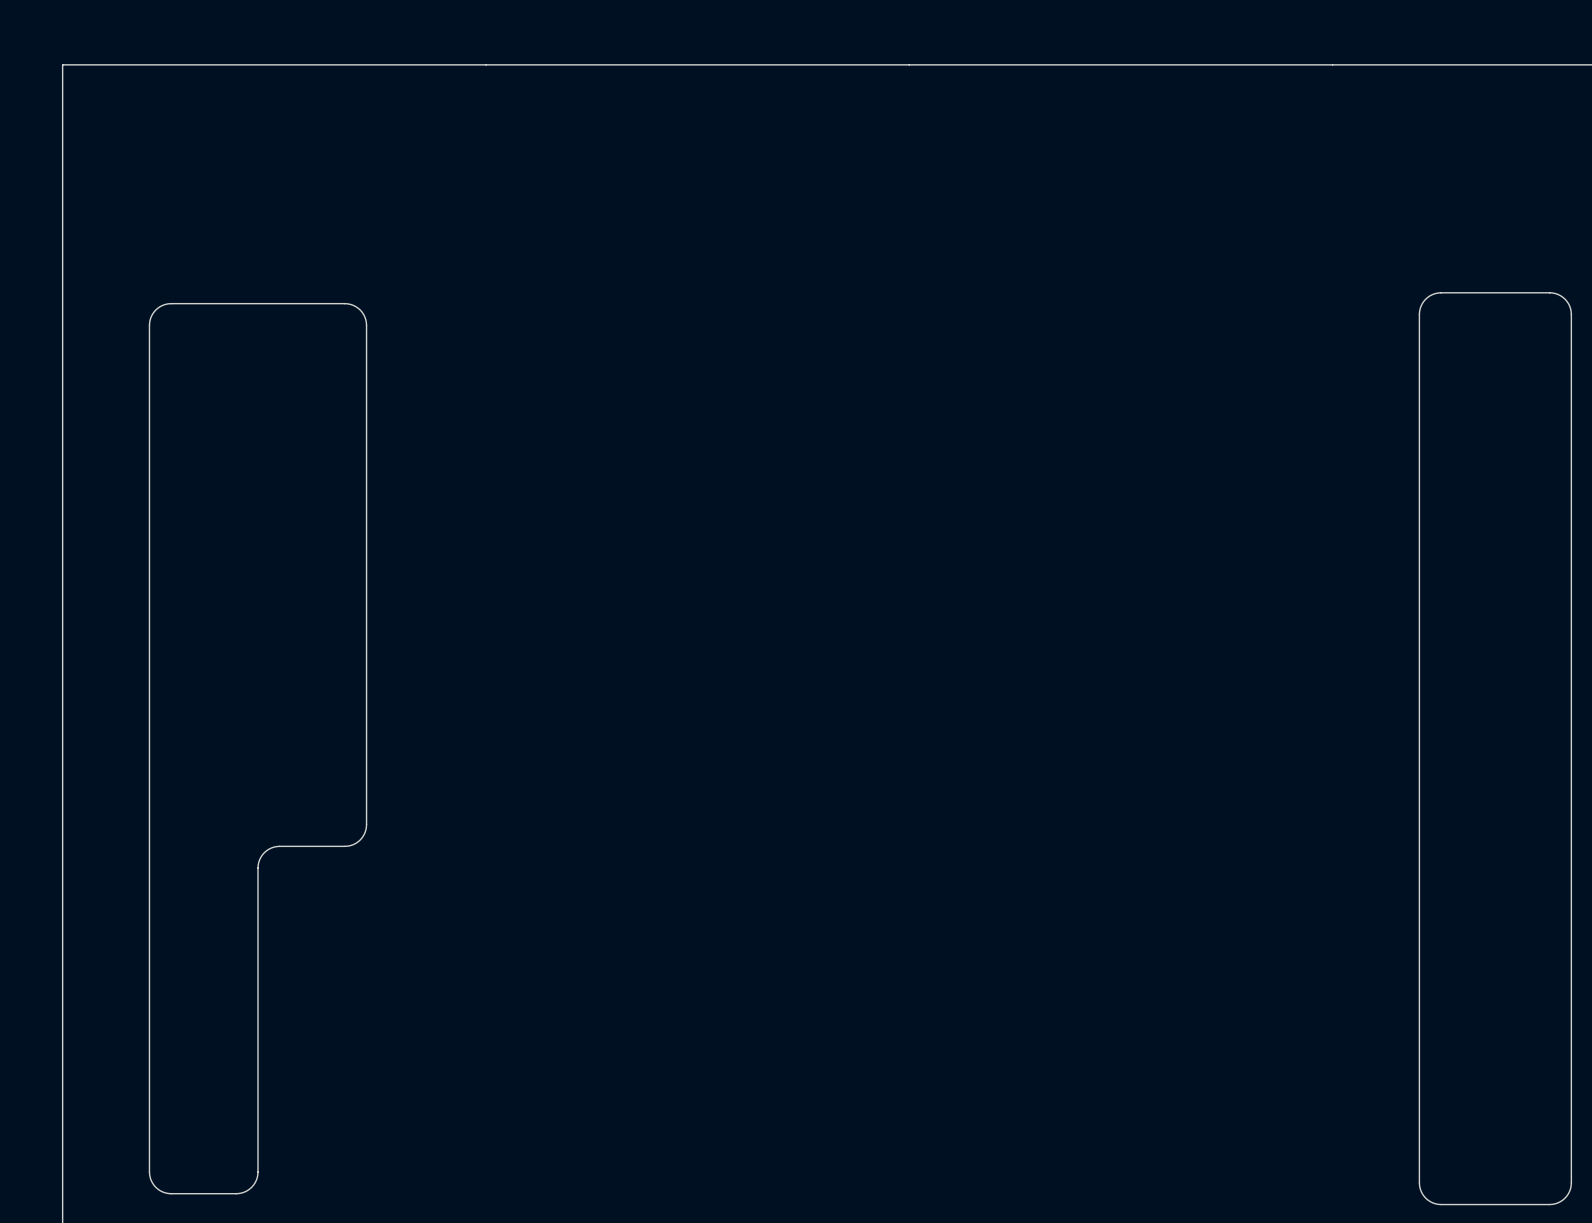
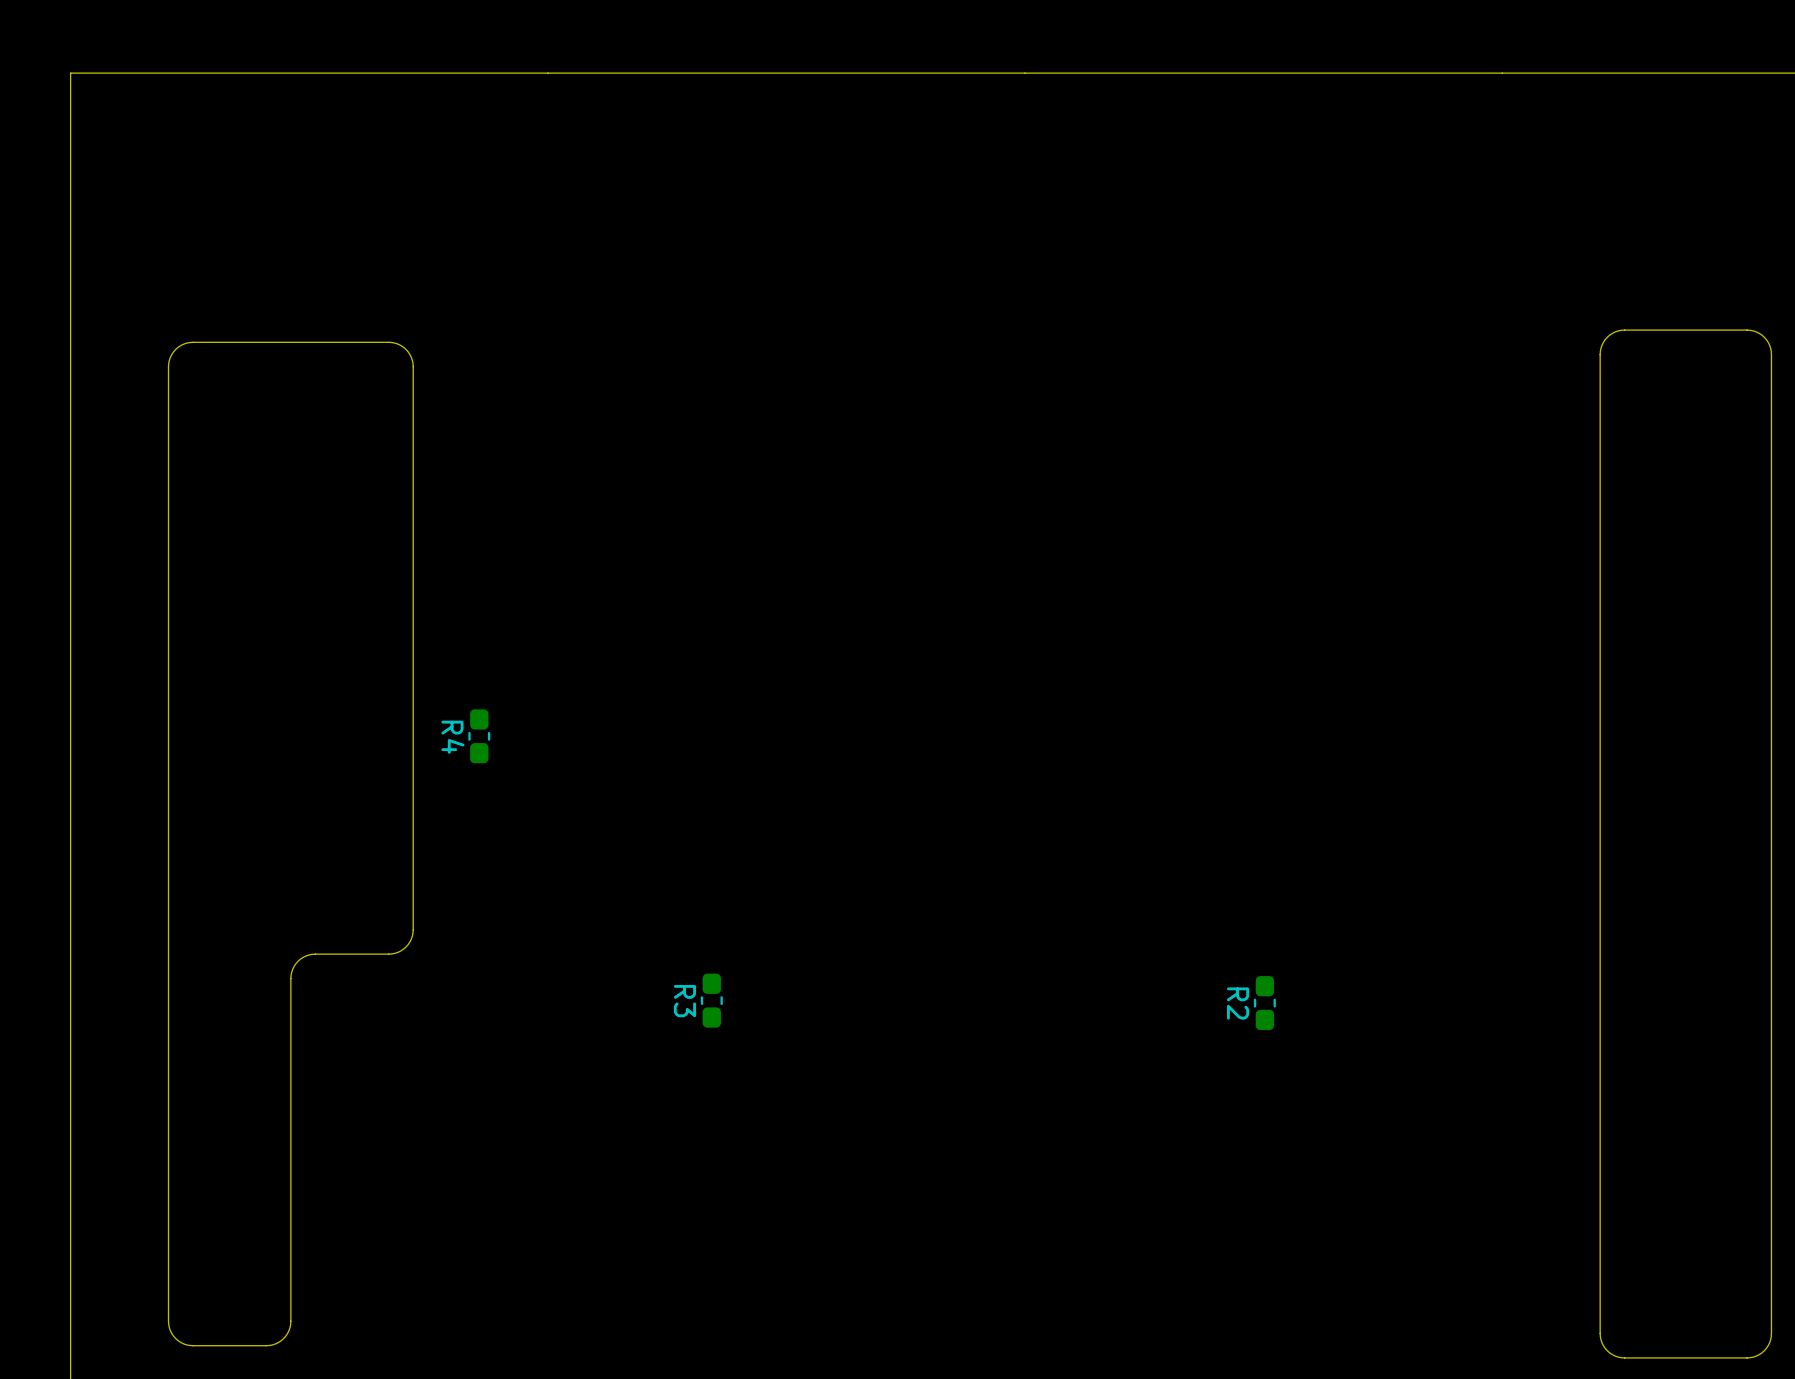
R4: none -> (479, 736)
R3: none -> (711, 1000)
R2: none -> (1264, 1003)

